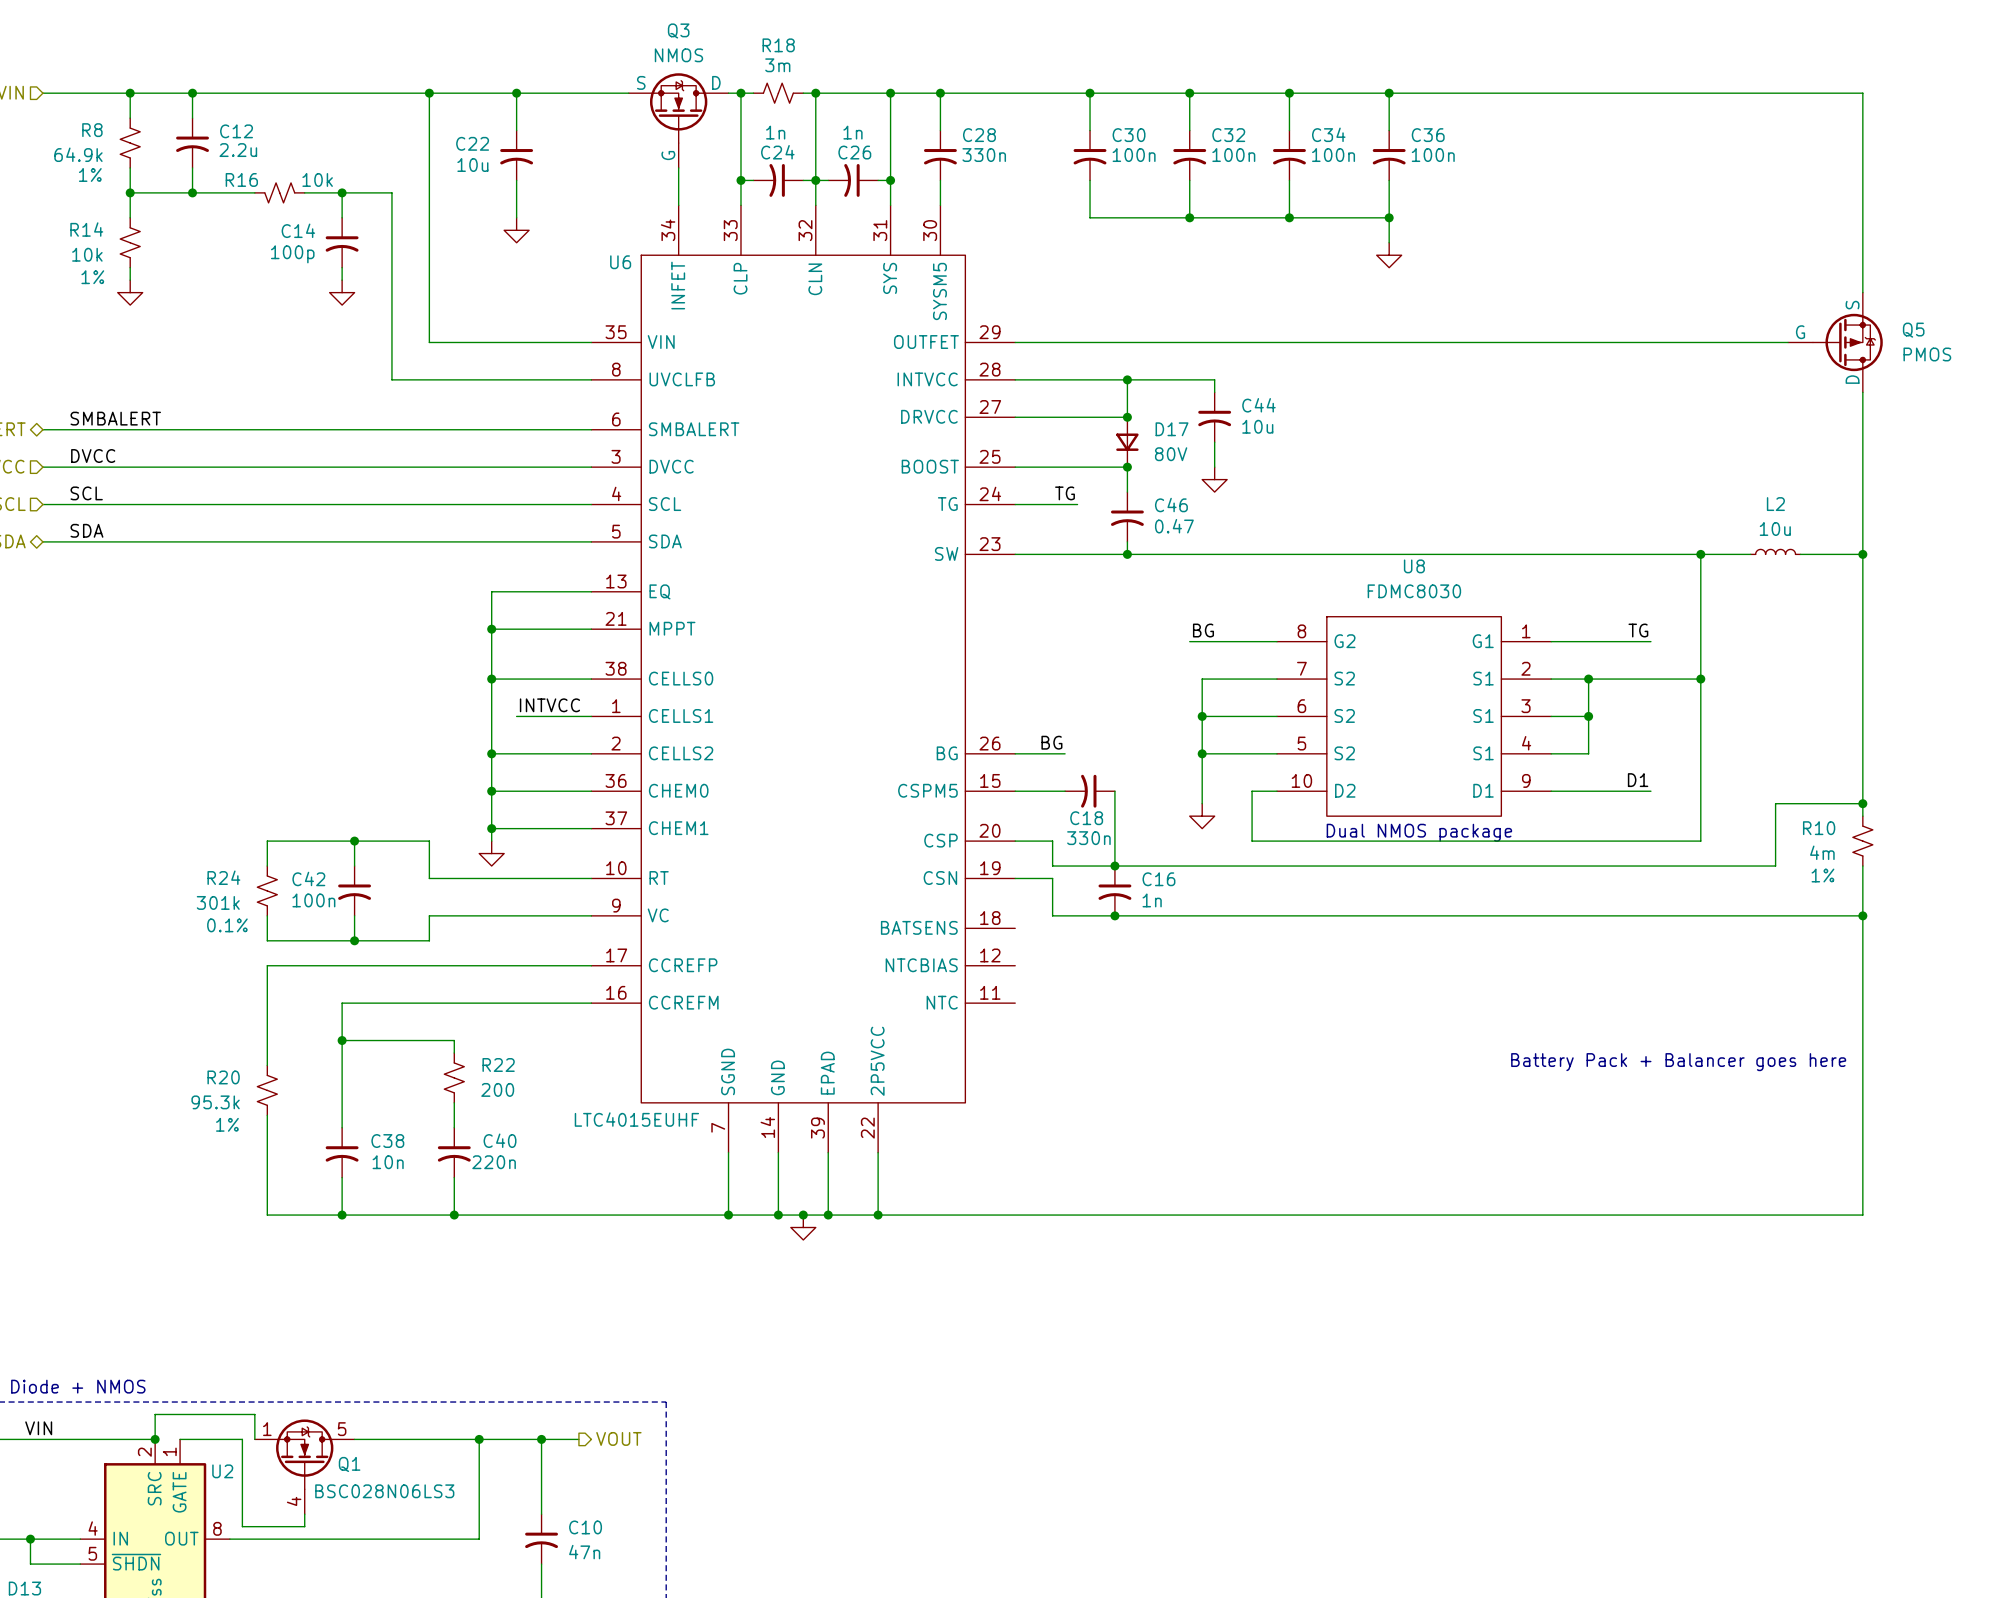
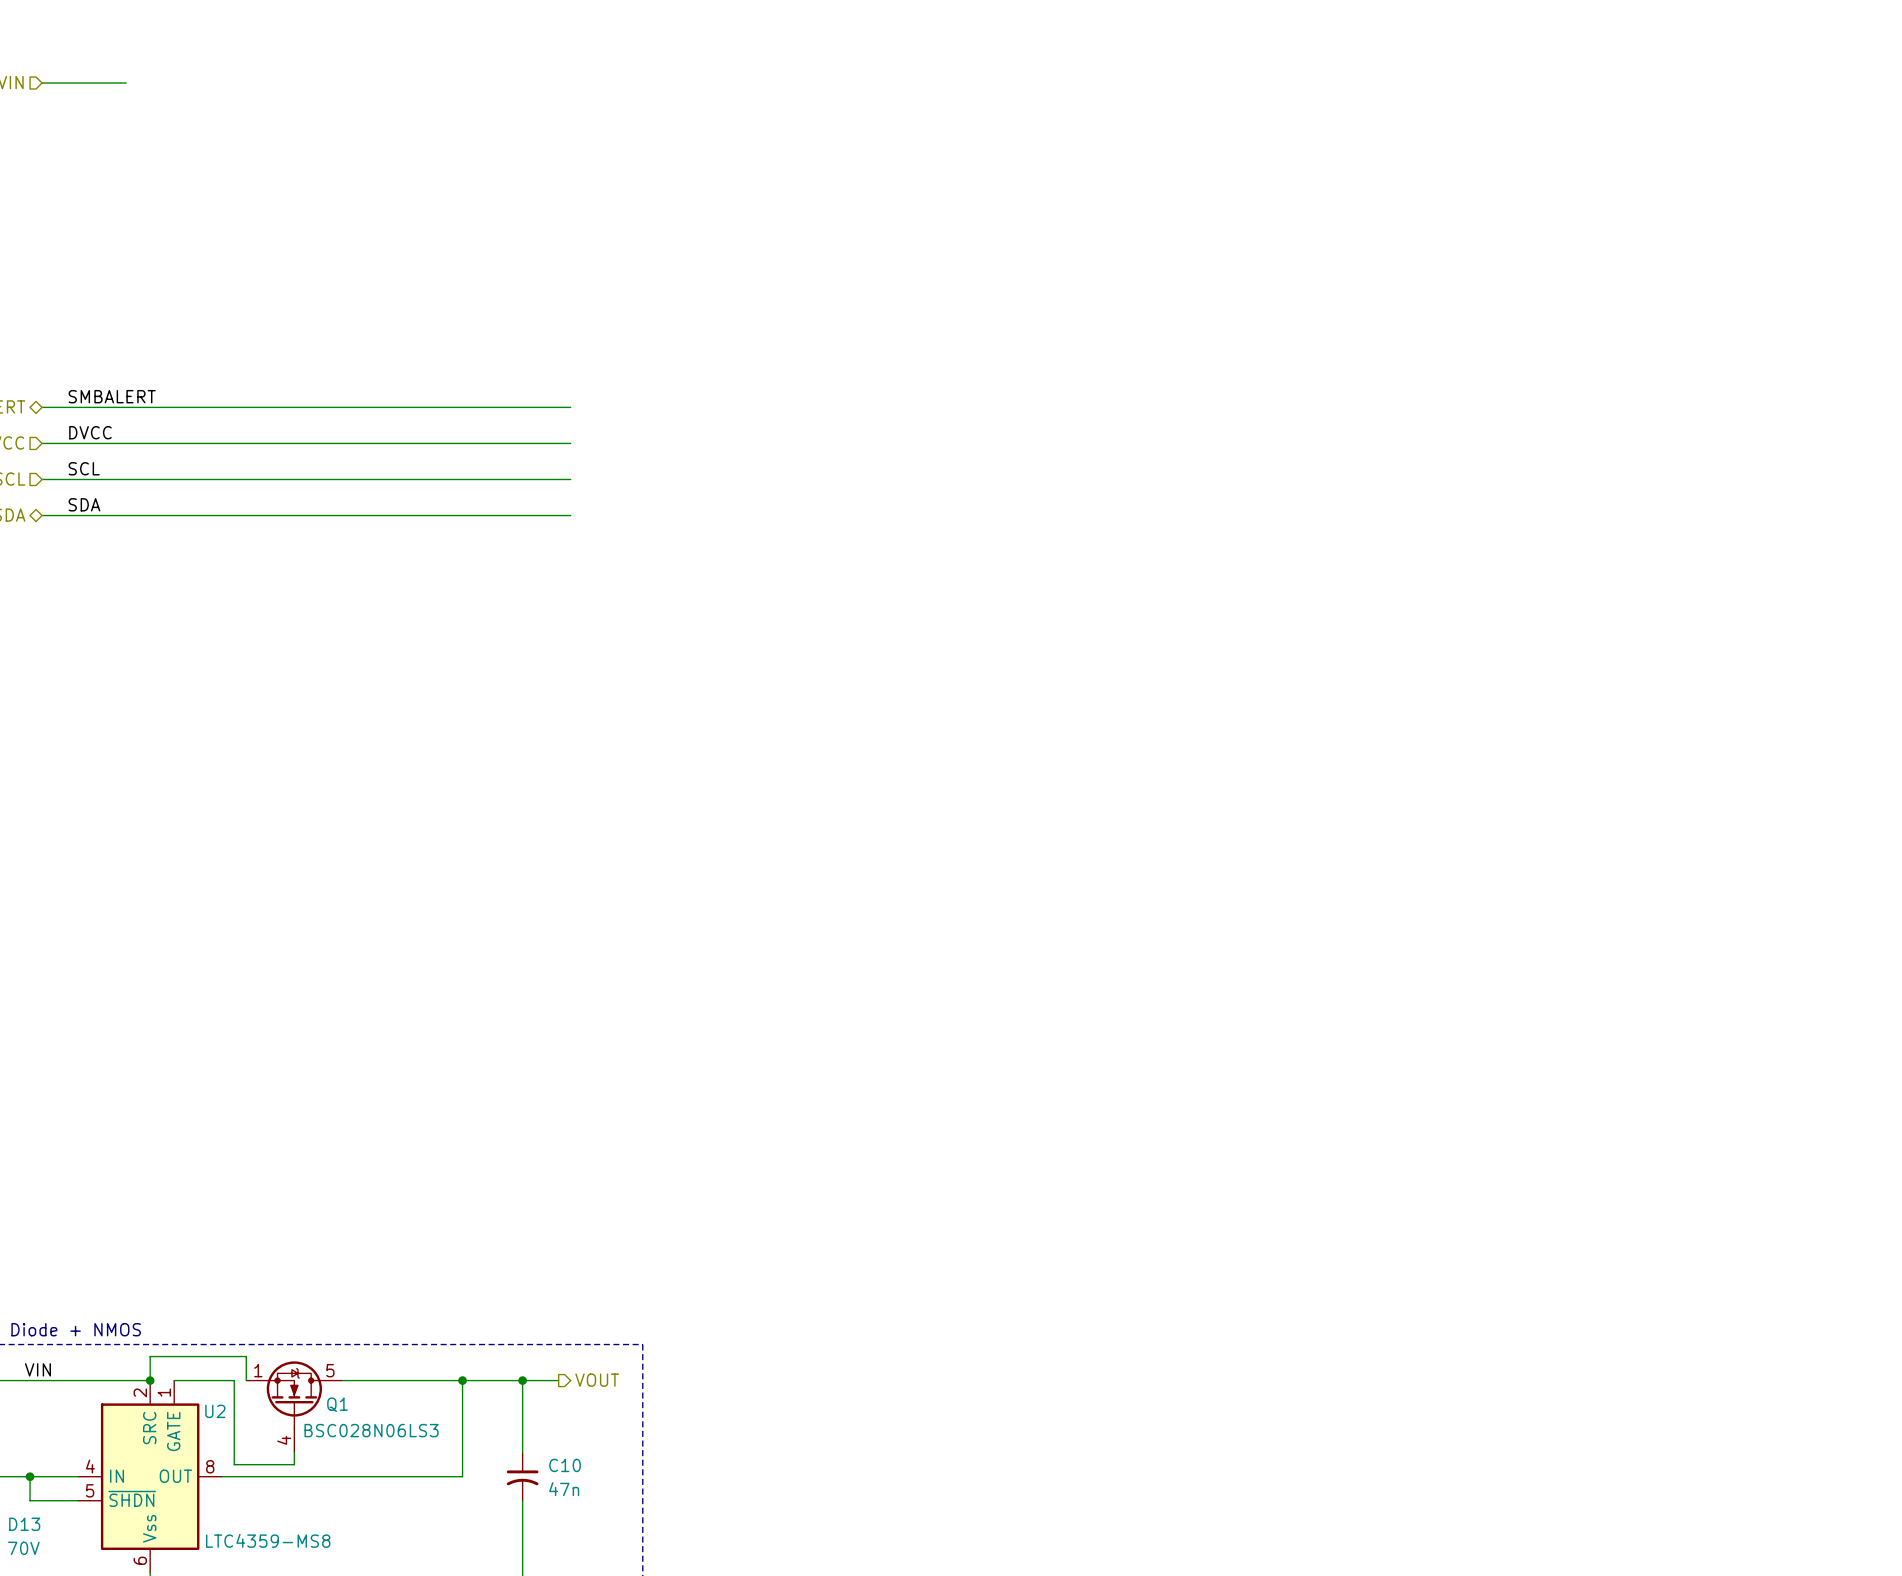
junction: (130, 93) -> none
wire: (192, 93) (192, 118) -> none
junction: (192, 93) -> none
wire: (429, 93) (429, 342) (591, 342) -> none
junction: (429, 93) -> none
wire: (516, 93) (516, 130) -> none
junction: (516, 93) -> none
wire: (628, 93) (130, 93) (130, 118) -> none
wire: (728, 93) (753, 93) -> none
wire: (740, 93) (740, 205) -> none
junction: (740, 93) -> none
R18: 3m (778, 93) -> none
wire: (803, 93) (1862, 93) (1862, 292) -> none
wire: (815, 93) (815, 205) -> none
junction: (815, 93) -> none
wire: (890, 93) (890, 205) -> none
junction: (890, 93) -> none
wire: (940, 93) (940, 130) -> none
junction: (940, 93) -> none
wire: (1090, 93) (1090, 130) -> none
junction: (1090, 93) -> none
wire: (1189, 93) (1189, 130) -> none
junction: (1189, 93) -> none
wire: (1289, 93) (1289, 130) -> none
junction: (1289, 93) -> none
wire: (1389, 93) (1389, 130) -> none
junction: (1389, 93) -> none
Q3: NMOS (678, 120) -> none
R8: 64.9k (130, 143) -> none
C12: 2.2u (192, 143) -> none
C22: 10u (516, 155) -> none
C28: 330n (940, 155) -> none
C30: 100n (1090, 155) -> none
C32: 100n (1189, 155) -> none
C34: 100n (1289, 155) -> none
C36: 100n (1389, 155) -> none
wire: (130, 167) (130, 217) -> none
wire: (192, 167) (192, 192) -> none
wire: (678, 167) (678, 205) -> none
wire: (516, 180) (516, 217) -> none
wire: (740, 180) (753, 180) -> none
junction: (740, 180) -> none
C24: 1n (778, 180) -> none
wire: (803, 180) (828, 180) -> none
junction: (815, 180) -> none
C26: 1n (853, 180) -> none
wire: (878, 180) (890, 180) -> none
junction: (890, 180) -> none
wire: (940, 180) (940, 205) -> none
wire: (1090, 180) (1090, 217) (1389, 217) -> none
wire: (1189, 180) (1189, 217) -> none
wire: (1289, 180) (1289, 217) -> none
wire: (1389, 180) (1389, 242) -> none
wire: (130, 192) (254, 192) -> none
junction: (130, 192) -> none
junction: (192, 192) -> none
R16: 10k (279, 192) -> none
wire: (304, 192) (391, 192) (391, 379) (591, 379) -> none
wire: (342, 192) (342, 217) -> none
junction: (342, 192) -> none
junction: (1189, 217) -> none
junction: (1289, 217) -> none
junction: (1389, 217) -> none
power symbol: (516, 230) -> none
R14: 10k (130, 242) -> none
C14: 100p (342, 242) -> none
power symbol: (1389, 255) -> none
wire: (130, 267) (130, 280) -> none
wire: (342, 267) (342, 280) -> none
power symbol: (130, 292) -> none
power symbol: (342, 292) -> none
wire: (1015, 342) (1788, 342) -> none
Q5: PMOS (1835, 342) -> none
wire: (1015, 379) (1214, 379) (1214, 392) -> none
wire: (1127, 379) (1127, 417) (1015, 417) -> none
junction: (1127, 379) -> none
wire: (1862, 392) (1862, 816) -> none
junction: (1127, 417) -> none
C44: 10u (1214, 417) -> none
D17: 80V (1127, 442) -> none
wire: (1214, 442) (1214, 467) -> none
wire: (1015, 467) (1127, 467) (1127, 492) -> none
junction: (1127, 467) -> none
power symbol: (1214, 479) -> none
label: TG (1064, 493) -> none
wire: (1015, 504) (1077, 504) -> none
C46: 0.47 (1127, 516) -> none
wire: (1127, 541) (1127, 554) -> none
L2: 10u (1775, 551) -> none
wire: (1015, 554) (1750, 554) -> none
junction: (1127, 554) -> none
wire: (1700, 554) (1700, 841) (1252, 841) (1252, 791) (1276, 791) -> none
junction: (1700, 554) -> none
wire: (1800, 554) (1862, 554) -> none
junction: (1862, 554) -> none
wire: (591, 591) (491, 591) (491, 841) -> none
wire: (491, 629) (591, 629) -> none
junction: (491, 629) -> none
label: BG (1203, 630) -> none
label: TG (1638, 630) -> none
wire: (1189, 641) (1276, 641) -> none
wire: (1551, 641) (1650, 641) -> none
wire: (491, 679) (591, 679) -> none
junction: (491, 679) -> none
U6: LTC4015EUHF (803, 679) -> none
wire: (1276, 679) (1202, 679) (1202, 803) -> none
wire: (1551, 679) (1700, 679) -> none
wire: (1588, 679) (1588, 753) (1551, 753) -> none
junction: (1588, 679) -> none
junction: (1700, 679) -> none
label: INTVCC (549, 705) -> none
wire: (516, 716) (591, 716) -> none
wire: (1202, 716) (1276, 716) -> none
junction: (1202, 716) -> none
U8: FDMC8030 (1414, 716) -> none
wire: (1551, 716) (1588, 716) -> none
junction: (1588, 716) -> none
label: BG (1051, 742) -> none
wire: (491, 753) (591, 753) -> none
junction: (491, 753) -> none
wire: (1015, 753) (1065, 753) -> none
wire: (1202, 753) (1276, 753) -> none
junction: (1202, 753) -> none
label: D1 (1638, 780) -> none
wire: (491, 791) (591, 791) -> none
junction: (491, 791) -> none
wire: (1015, 791) (1065, 791) -> none
C18: 330n (1090, 791) -> none
wire: (1114, 791) (1114, 866) -> none
wire: (1551, 791) (1650, 791) -> none
wire: (1862, 803) (1775, 803) (1775, 866) (1052, 866) (1052, 841) (1015, 841) -> none
junction: (1862, 803) -> none
power symbol: (1202, 816) -> none
wire: (491, 828) (591, 828) -> none
junction: (491, 828) -> none
text: Dual NMOS package (1419, 832) -> none
wire: (354, 841) (354, 866) -> none
junction: (354, 841) -> none
R10: 4m (1862, 841) -> none
power symbol: (491, 853) -> none
wire: (267, 866) (267, 841) (429, 841) (429, 878) (591, 878) -> none
junction: (1114, 866) -> none
wire: (1862, 866) (1862, 1215) (267, 1215) (267, 1115) -> none
wire: (1015, 878) (1052, 878) (1052, 915) (1862, 915) -> none
R24: 301k (267, 890) -> none
C42: 100n (354, 890) -> none
C16: 1n (1114, 890) -> none
wire: (267, 915) (267, 940) (429, 940) (429, 915) (591, 915) -> none
wire: (354, 915) (354, 940) -> none
junction: (1114, 915) -> none
junction: (1862, 915) -> none
junction: (354, 940) -> none
wire: (591, 965) (267, 965) (267, 1065) -> none
wire: (591, 1003) (342, 1003) (342, 1127) -> none
wire: (342, 1040) (454, 1040) (454, 1052) -> none
junction: (342, 1040) -> none
text: Battery Pack + Balancer goes here (1678, 1062) -> none
R22: 200 (454, 1077) -> none
R20: 95.3k (267, 1090) -> none
wire: (454, 1102) (454, 1127) -> none
C38: 10n (342, 1152) -> none
C40: 220n (454, 1152) -> none
wire: (728, 1152) (728, 1215) -> none
wire: (778, 1152) (778, 1215) -> none
wire: (828, 1152) (828, 1215) -> none
wire: (878, 1152) (878, 1215) -> none
wire: (342, 1177) (342, 1215) -> none
wire: (454, 1177) (454, 1215) -> none
junction: (342, 1215) -> none
junction: (454, 1215) -> none
junction: (728, 1215) -> none
junction: (778, 1215) -> none
junction: (803, 1215) -> none
junction: (828, 1215) -> none
junction: (878, 1215) -> none
power symbol: (803, 1227) -> none

